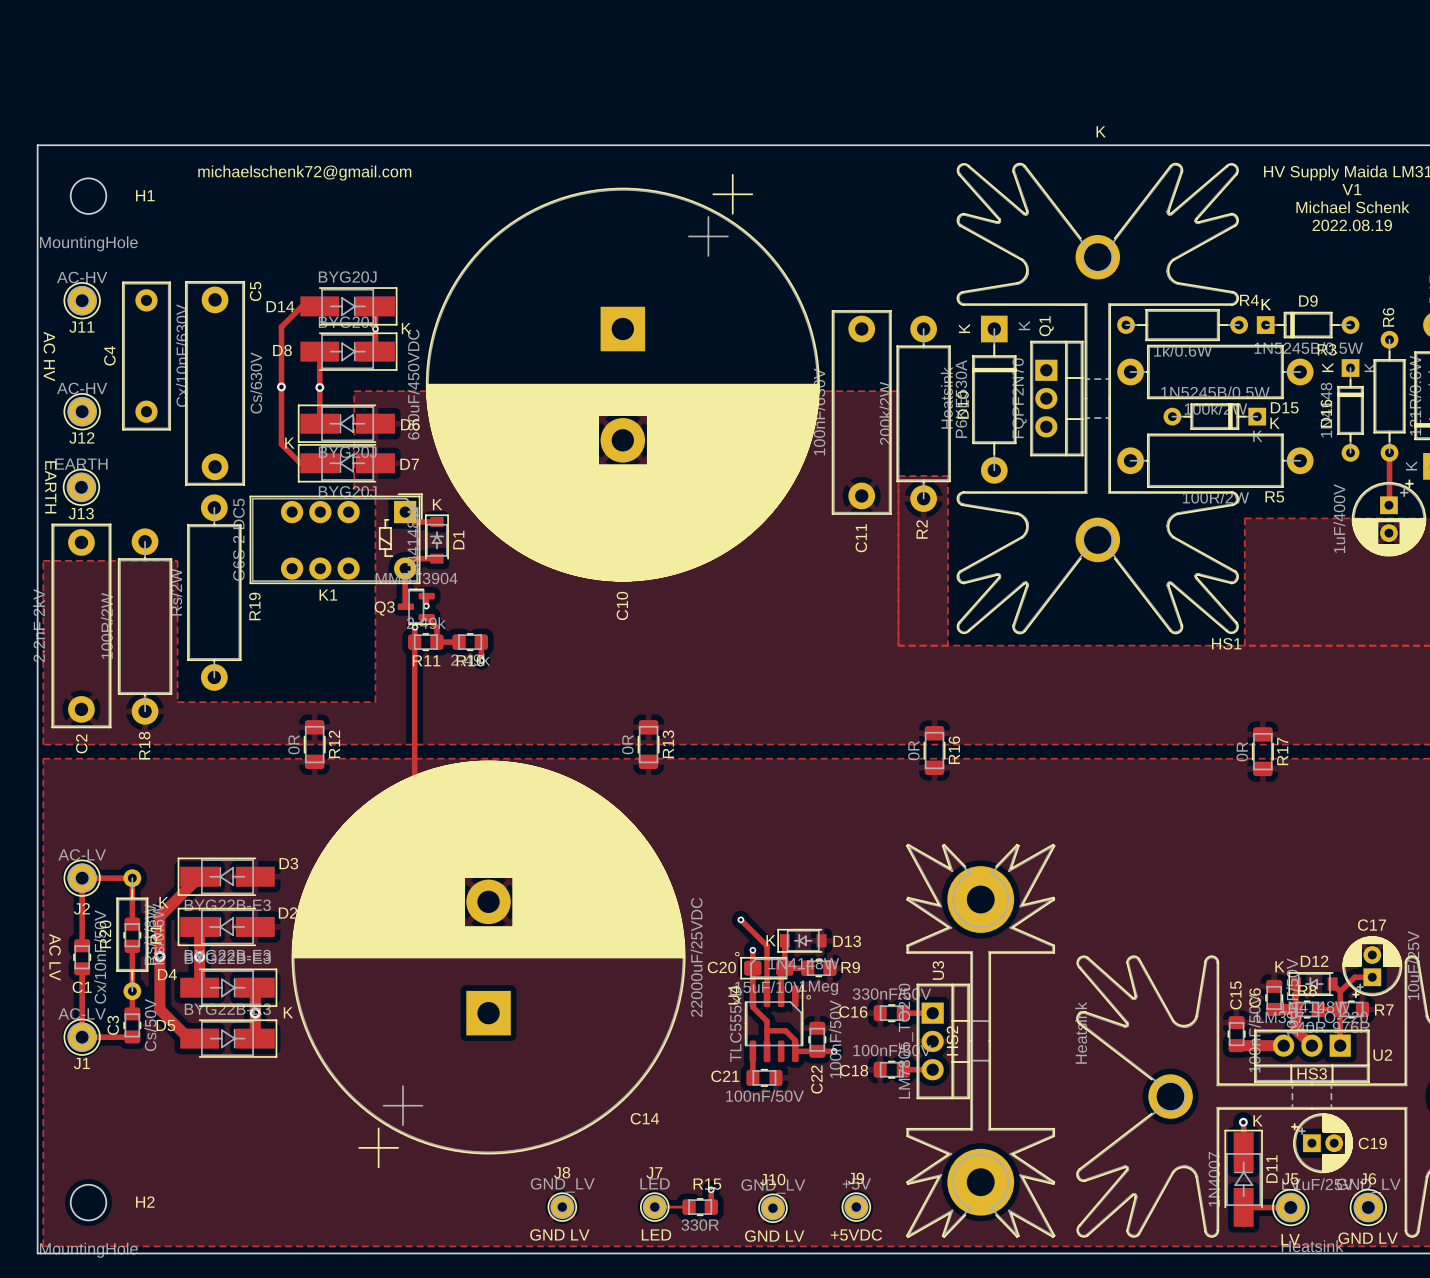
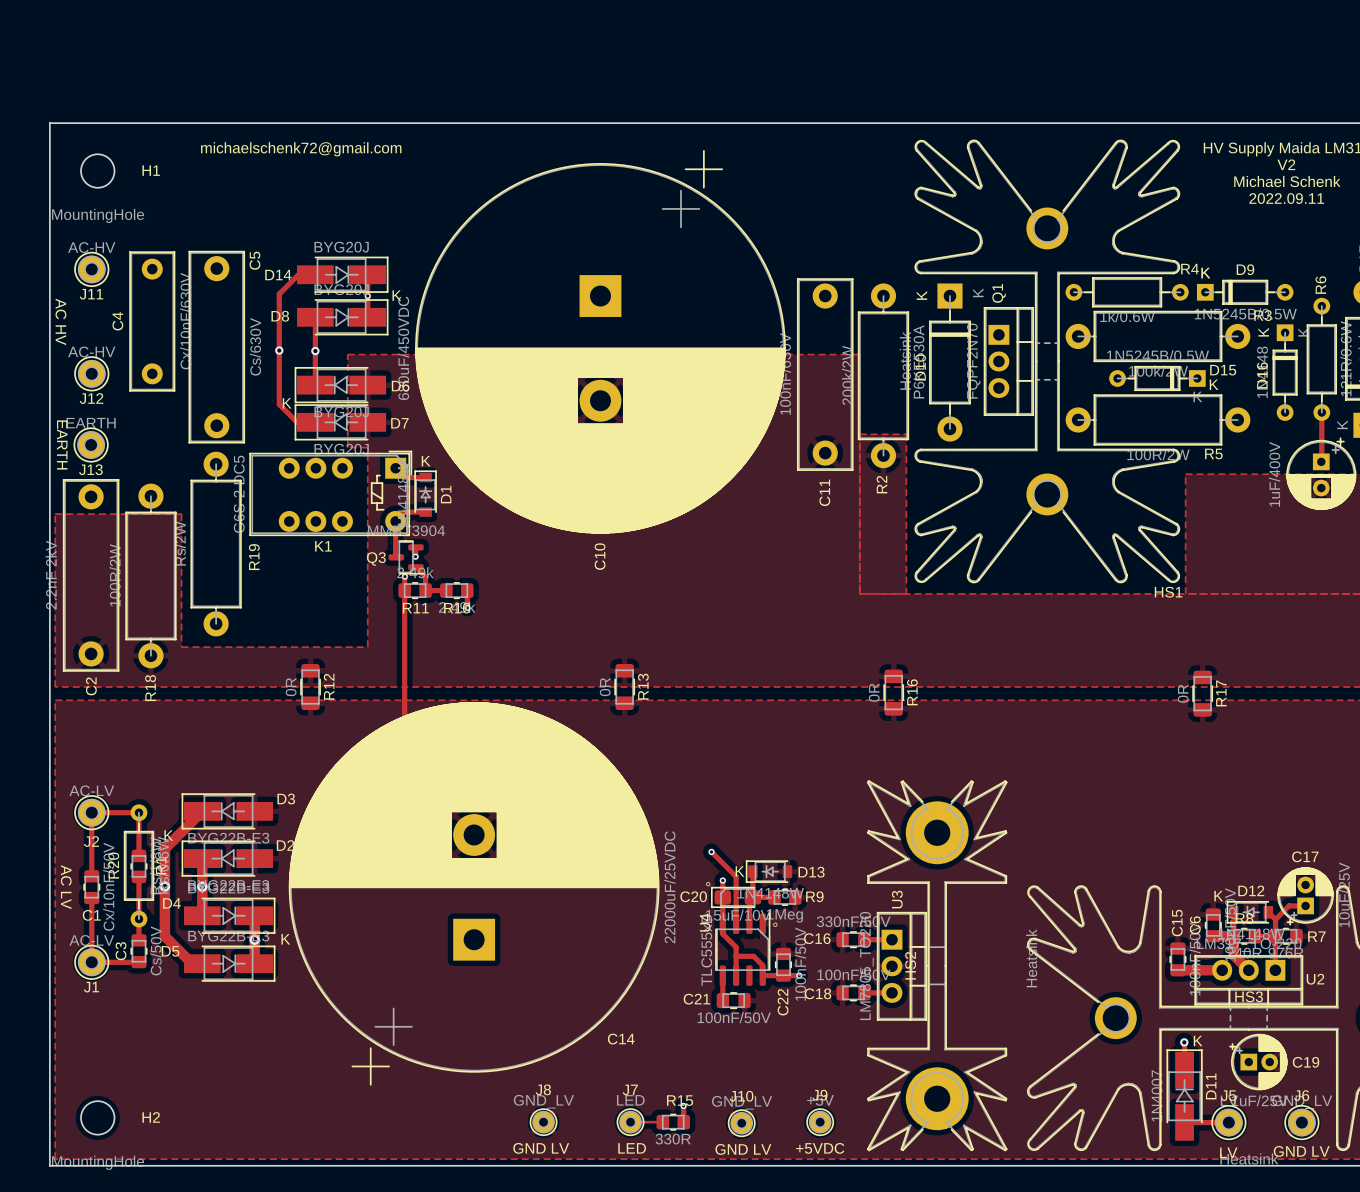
text: K (1101, 131) -> none
text: V1 (1351, 189) -> V2 (1286, 164)
text: 2022.08.19 (1352, 225) -> 2022.09.11 (1286, 198)

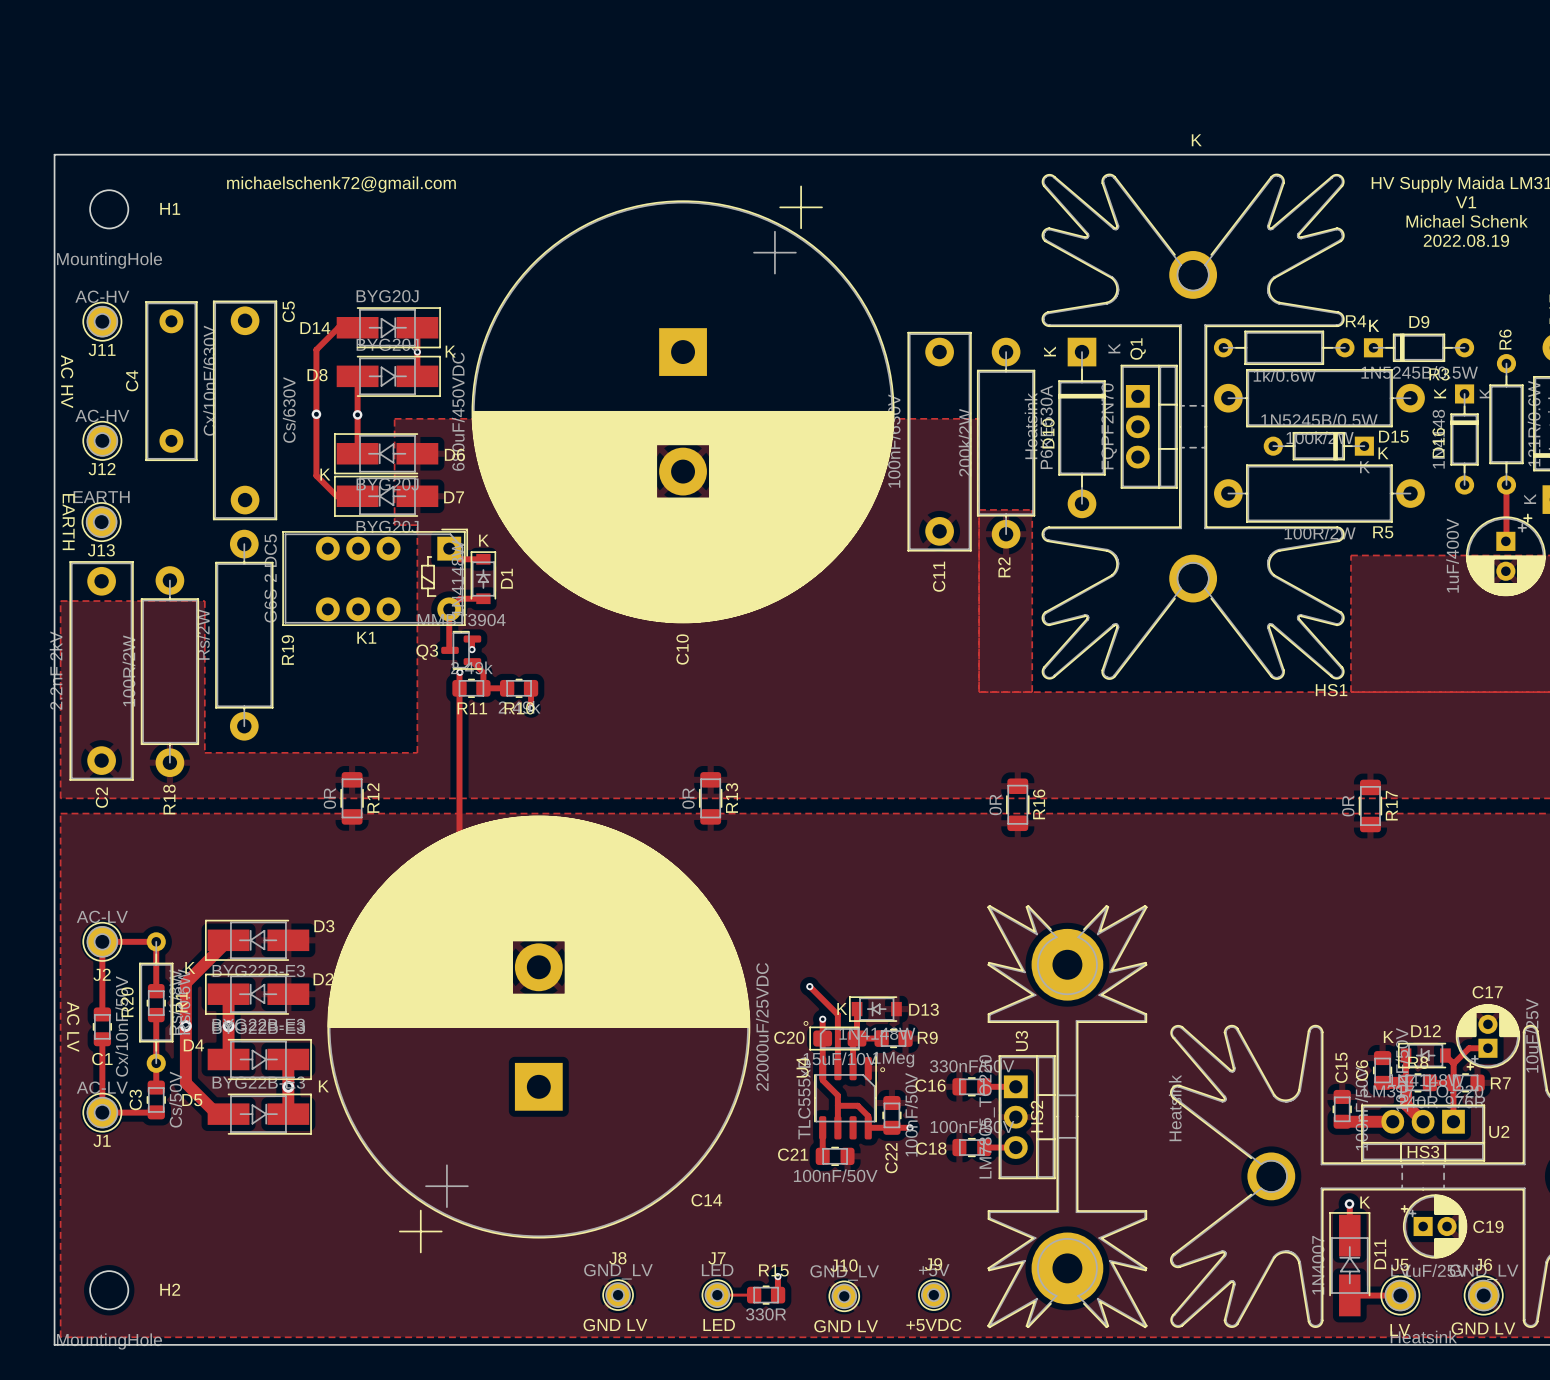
text: none -> K (1196, 140)
text: V2 (1286, 164) -> V1 (1466, 202)
text: 2022.09.11 (1286, 198) -> 2022.08.19 (1466, 240)

